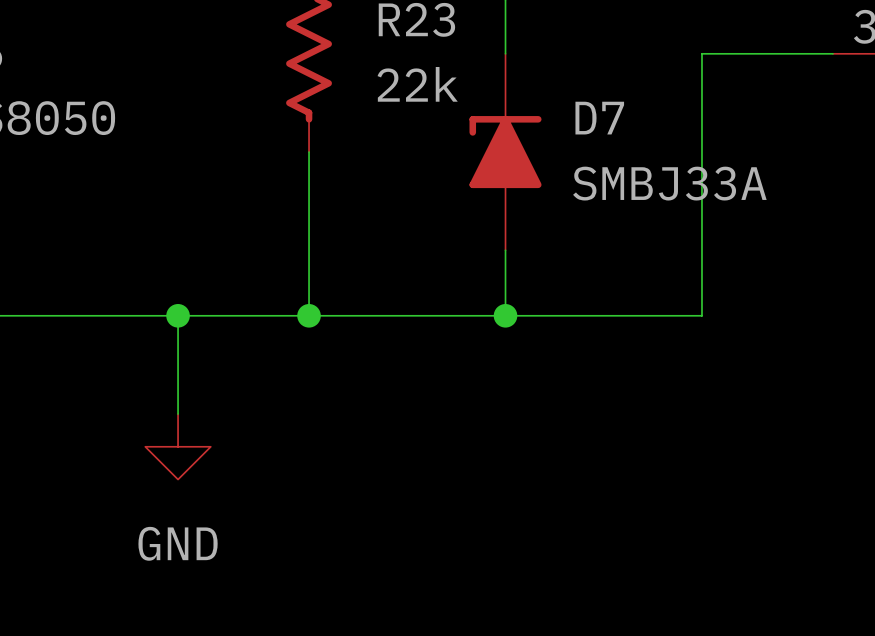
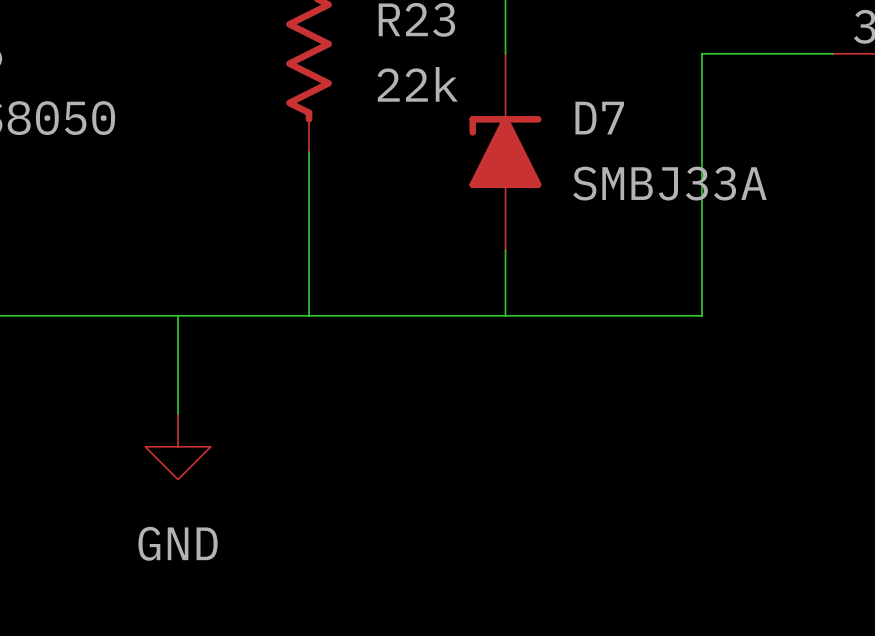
junction: (178, 315) -> none
junction: (309, 315) -> none
junction: (505, 315) -> none

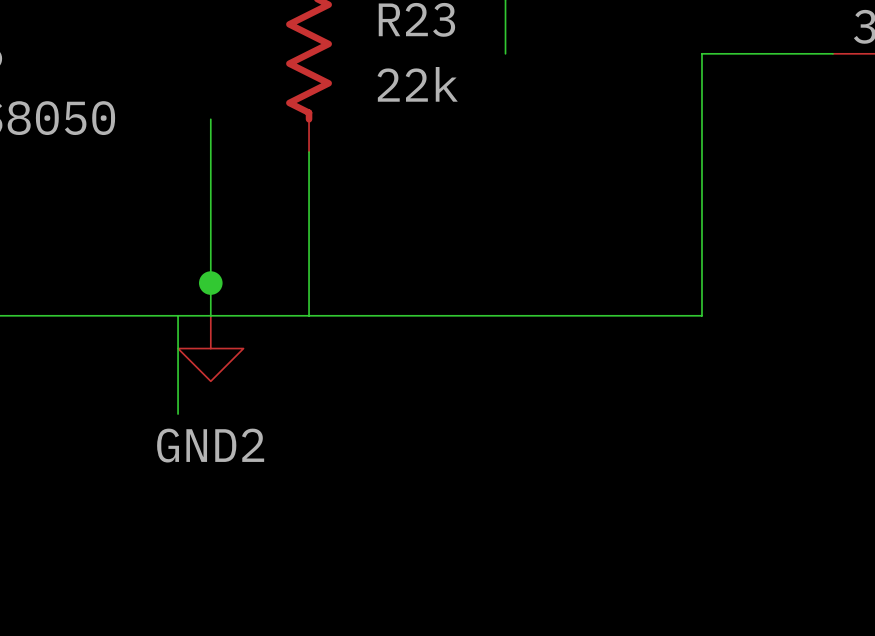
wire: none -> (210, 119) (210, 315)
D7: SMBJ33A (505, 152) -> none
wire: (505, 250) (505, 315) -> none
junction: none -> (210, 283)
power symbol: none -> GND2 (210, 348)
power symbol: GND (178, 446) -> none

